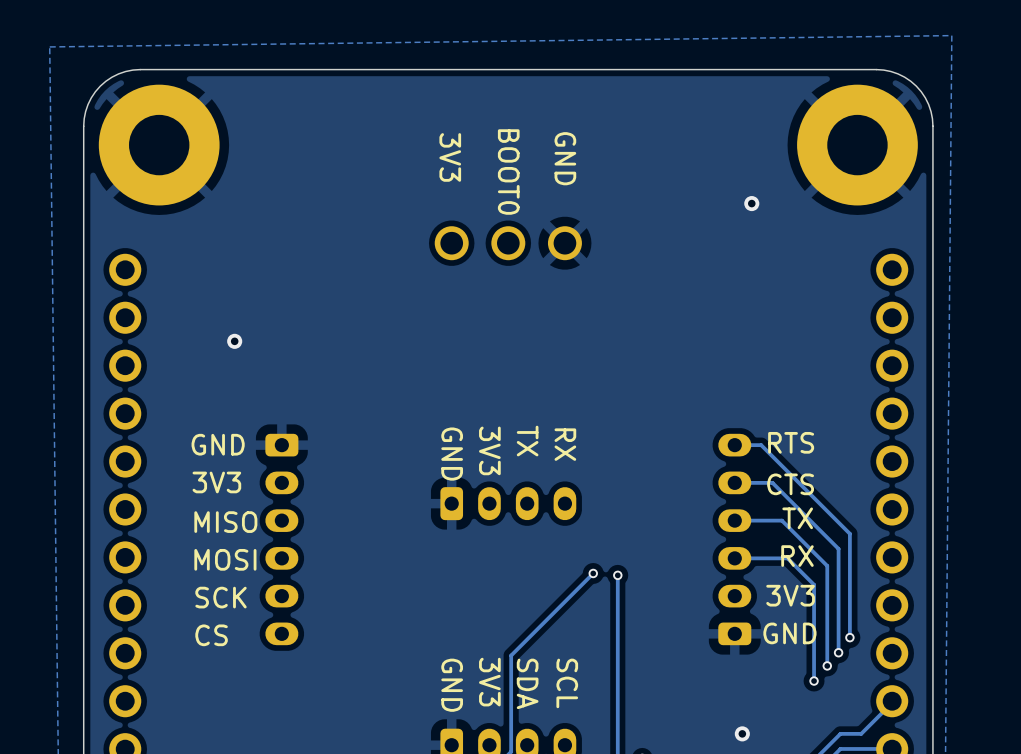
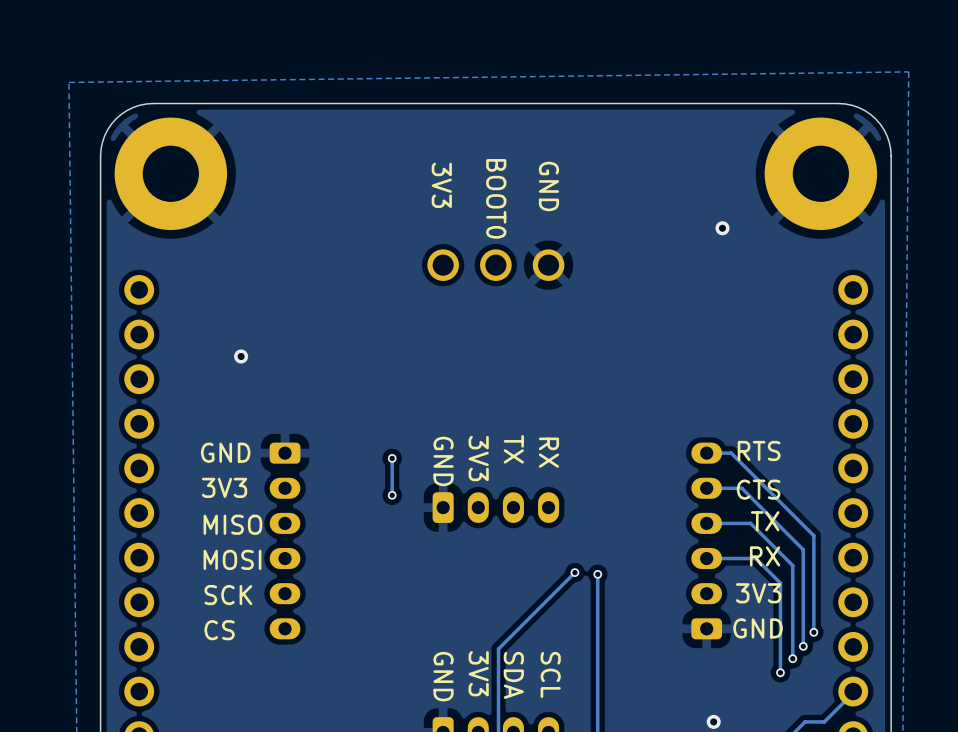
track: none -> (392, 458) (392, 495)
via: none -> (392, 458)
via: none -> (392, 495)

